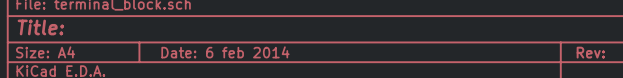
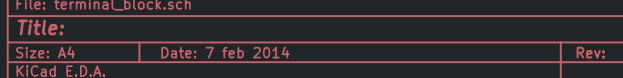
title block: Date: 6 feb 2014 (225, 52) -> Date: 7 feb 2014 (225, 52)

